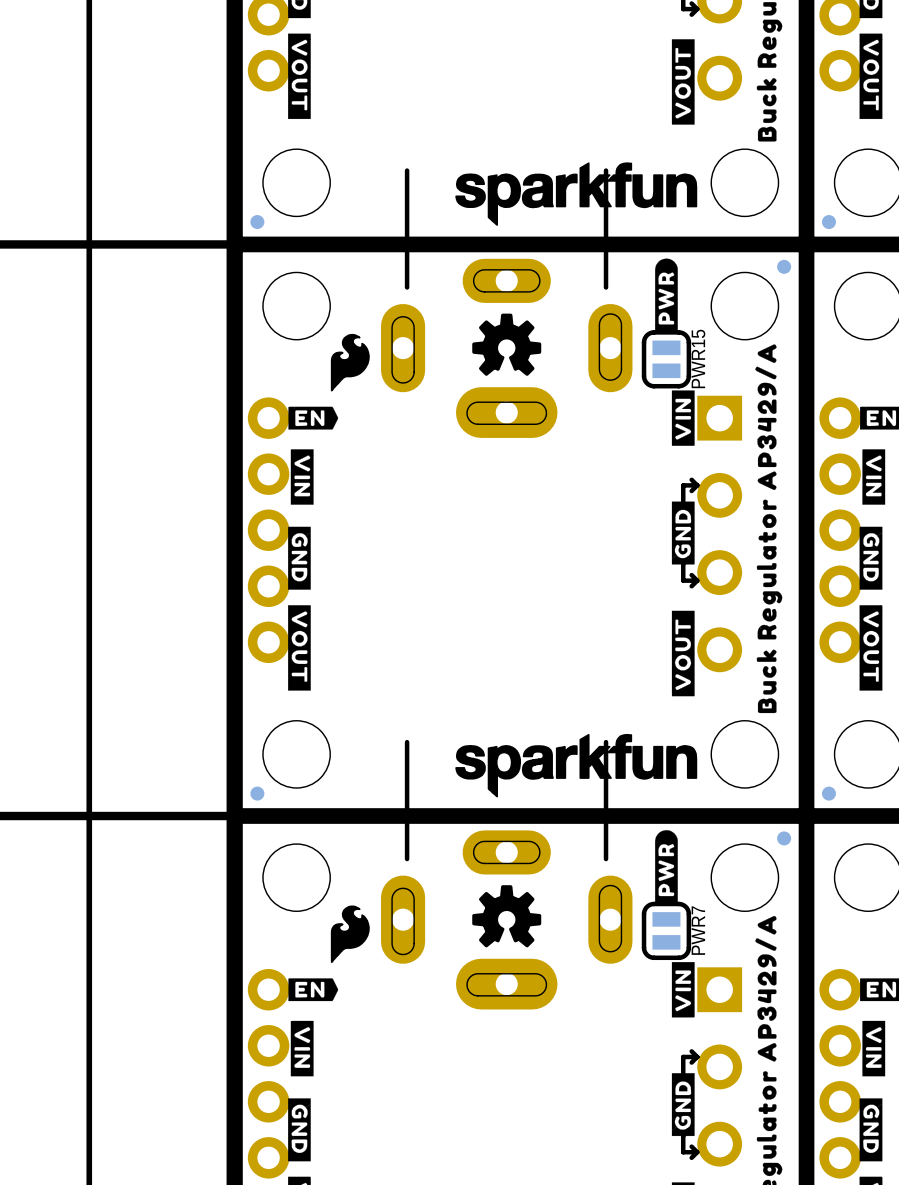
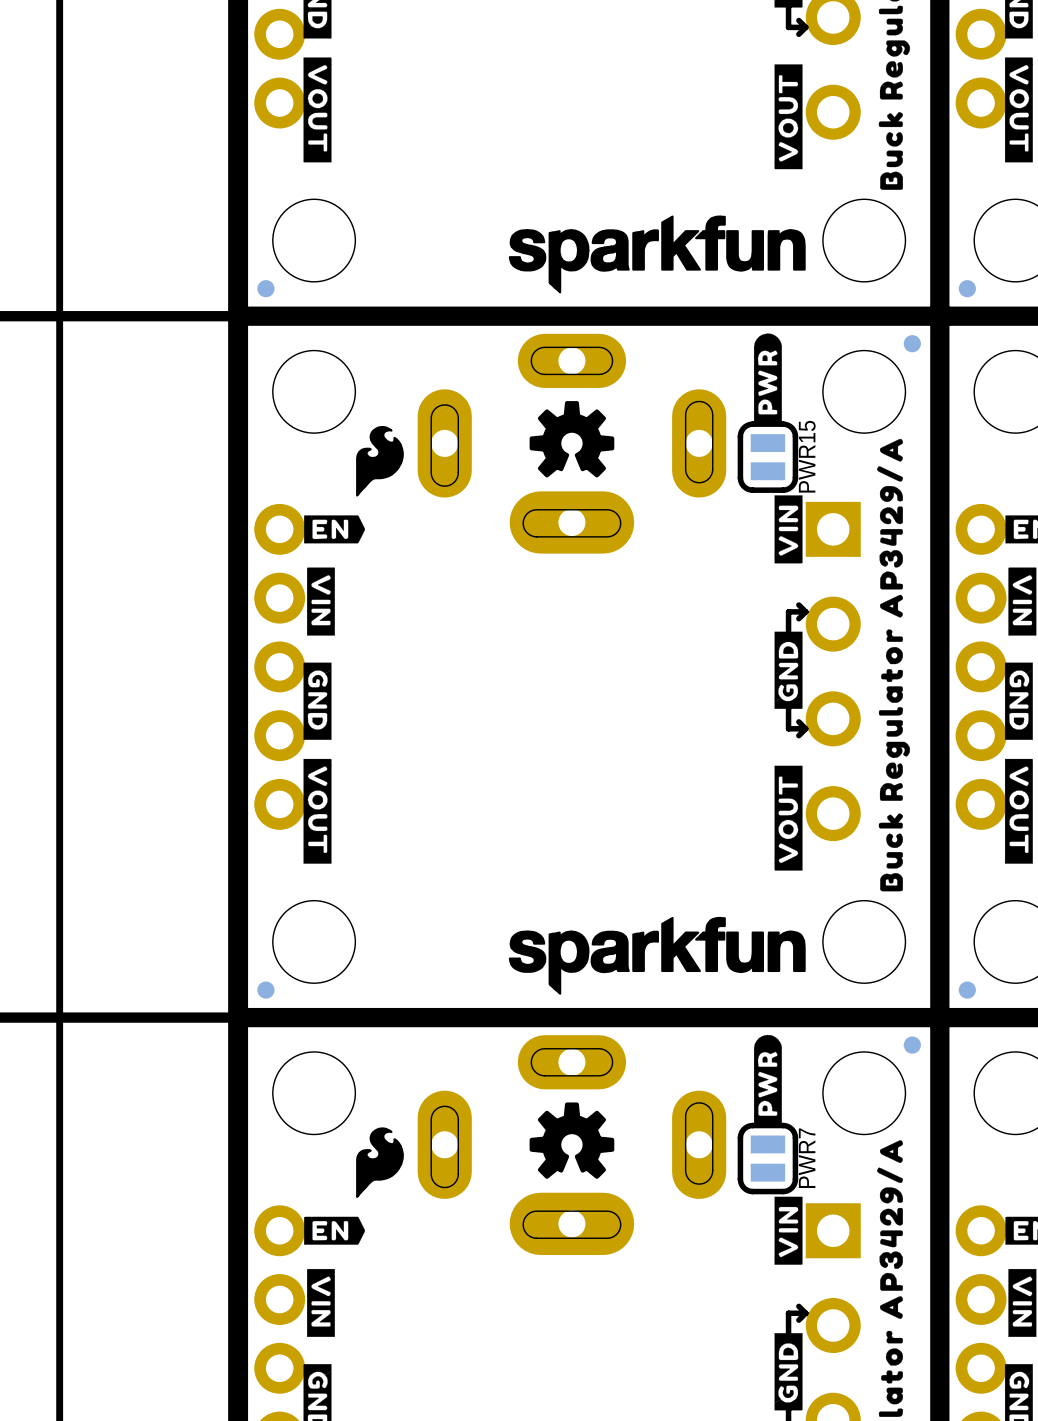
part: (506, 303) -> none
part: (506, 874) -> none

